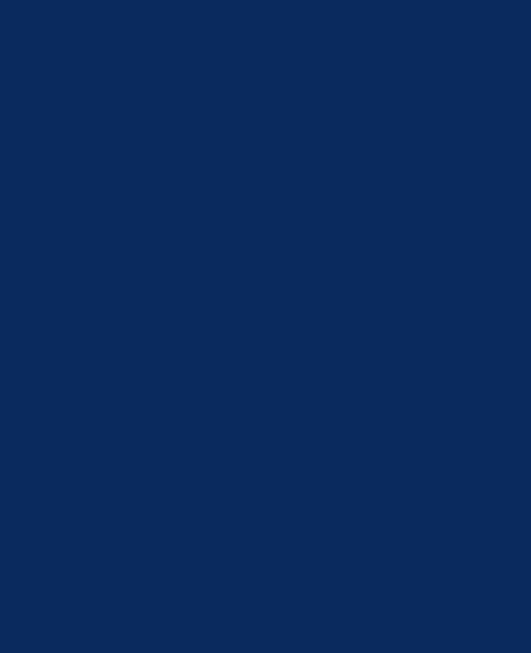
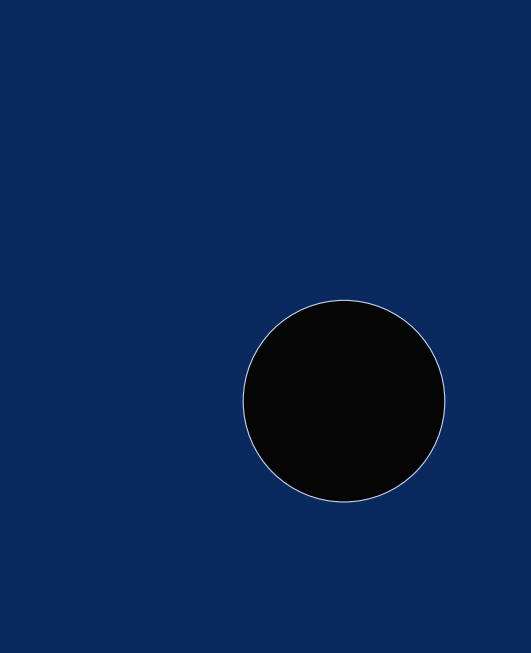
part: none -> (343, 401)

